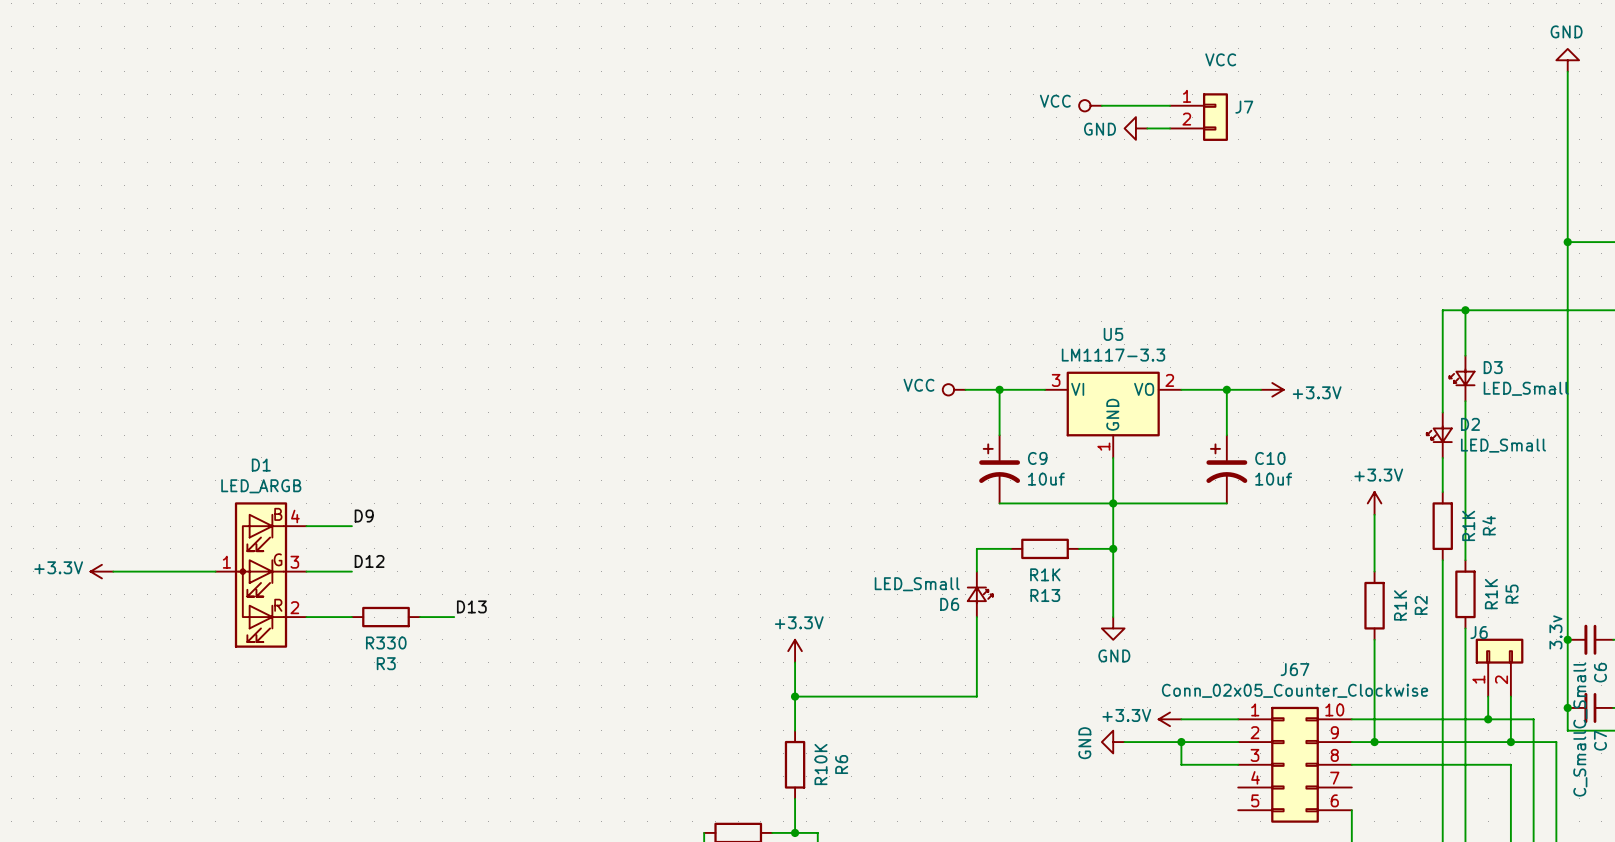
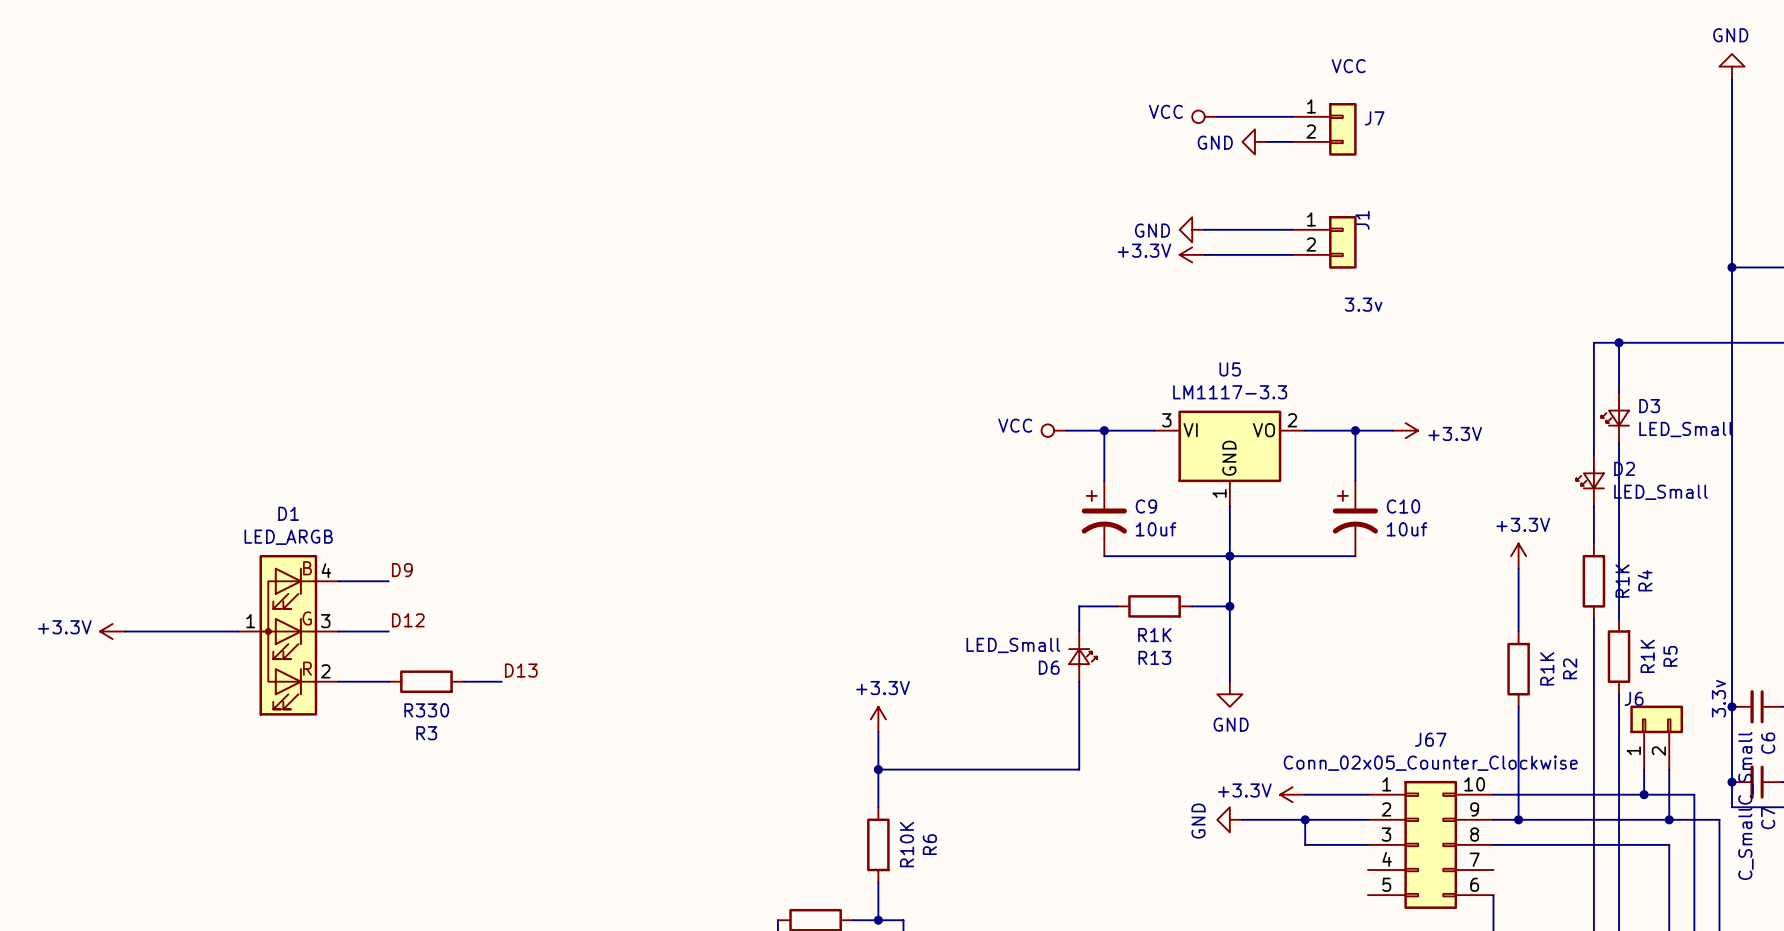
power symbol: none -> GND (1192, 229)
wire: none -> (1204, 229) (1292, 229)
J1: none -> 3.3v (1324, 242)
power symbol: none -> +3.3V (1192, 254)
wire: none -> (1204, 254) (1292, 254)

